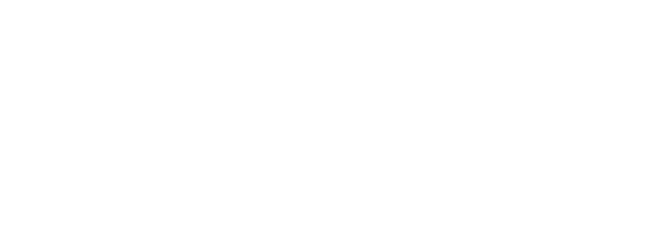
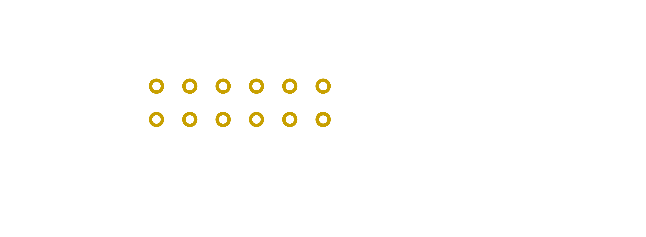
part: none -> (239, 102)

